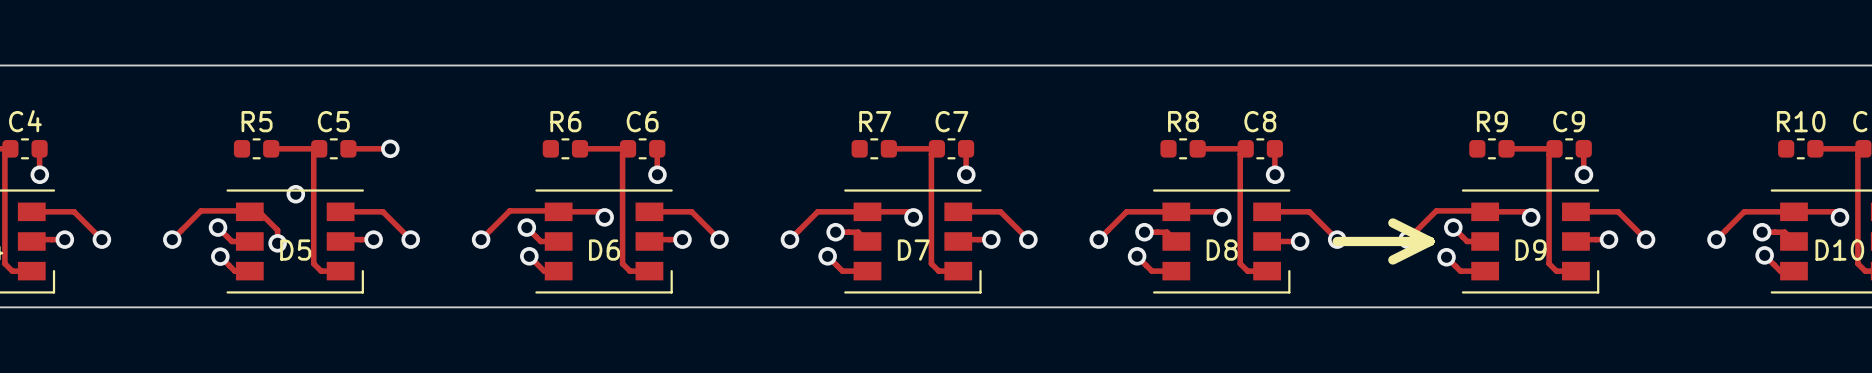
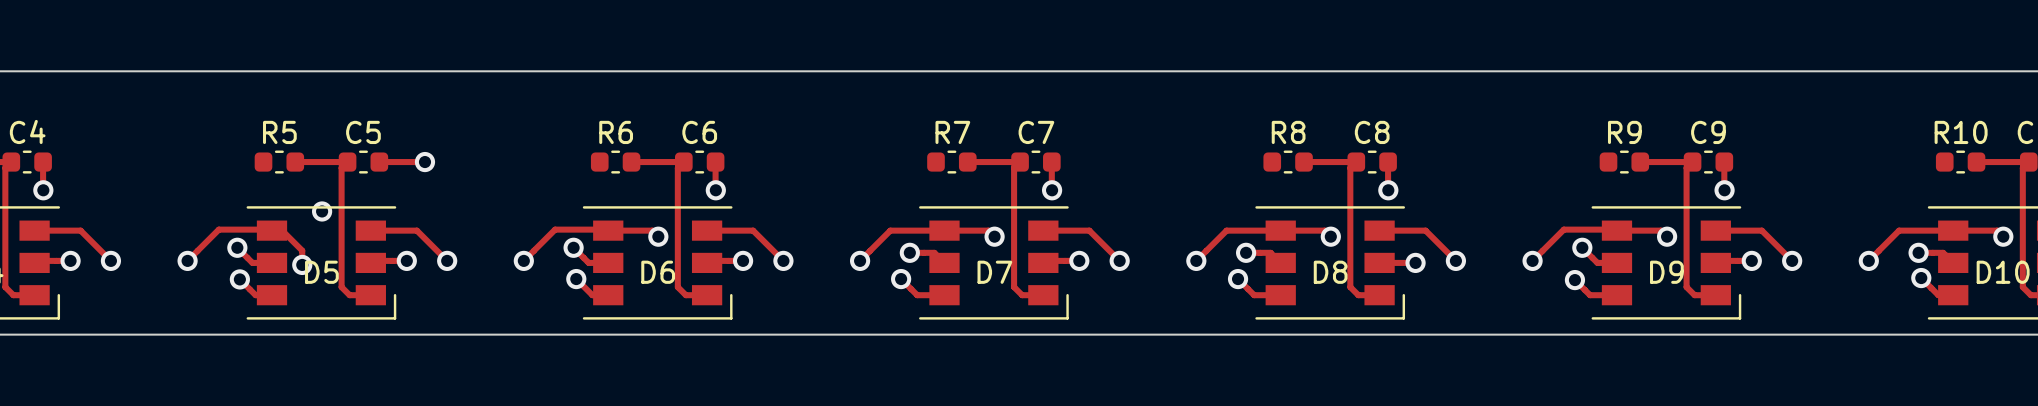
line: (1392, 222) (1429, 241) -> none
line: (1337, 241) (1429, 241) -> none
line: (1429, 241) (1392, 260) -> none

